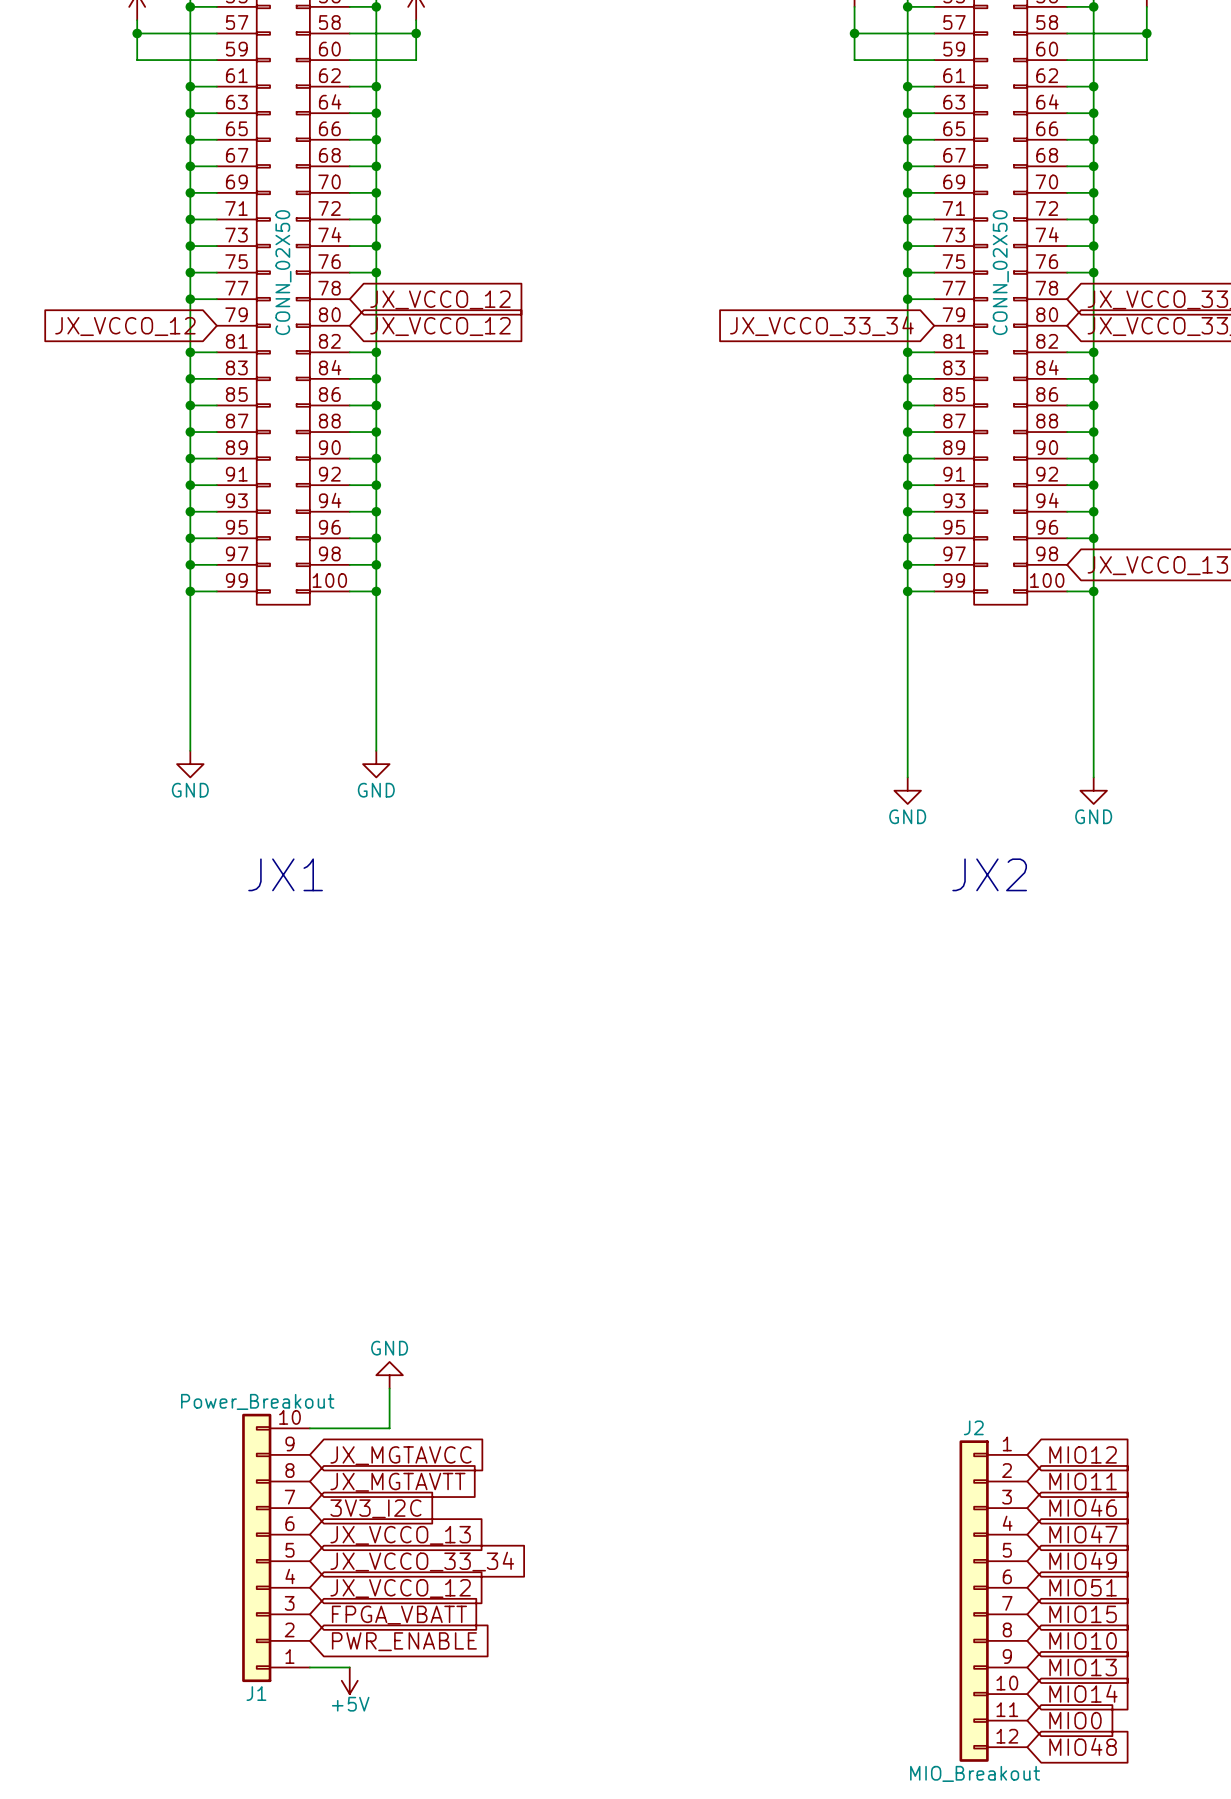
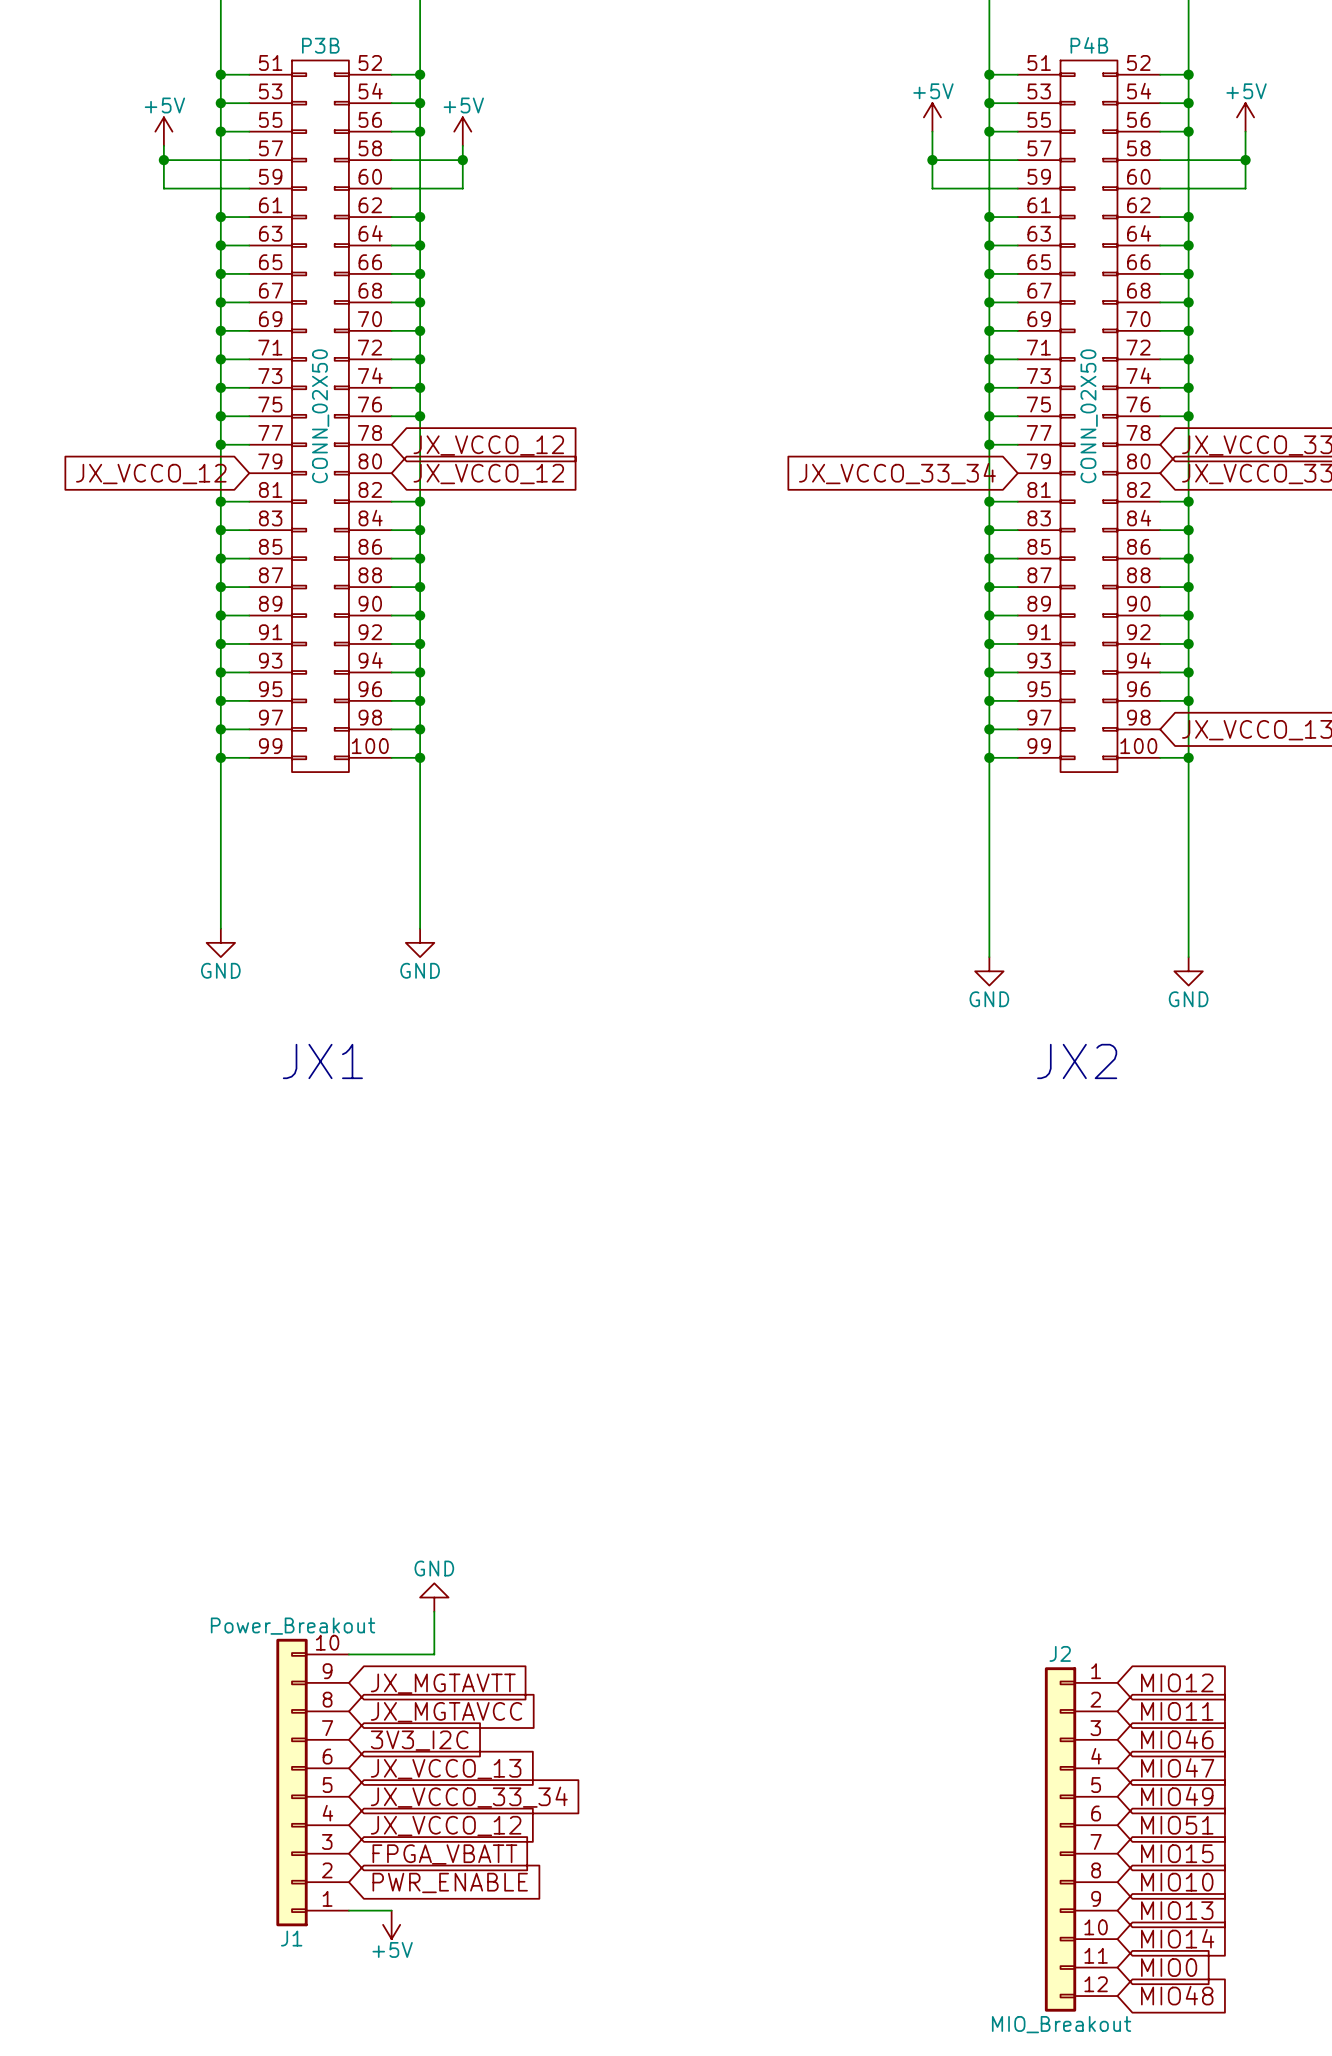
global label: JX_MGTAVCC (400, 1455) -> JX_MGTAVTT (443, 1683)
global label: JX_MGTAVTT (397, 1482) -> JX_MGTAVCC (446, 1712)

